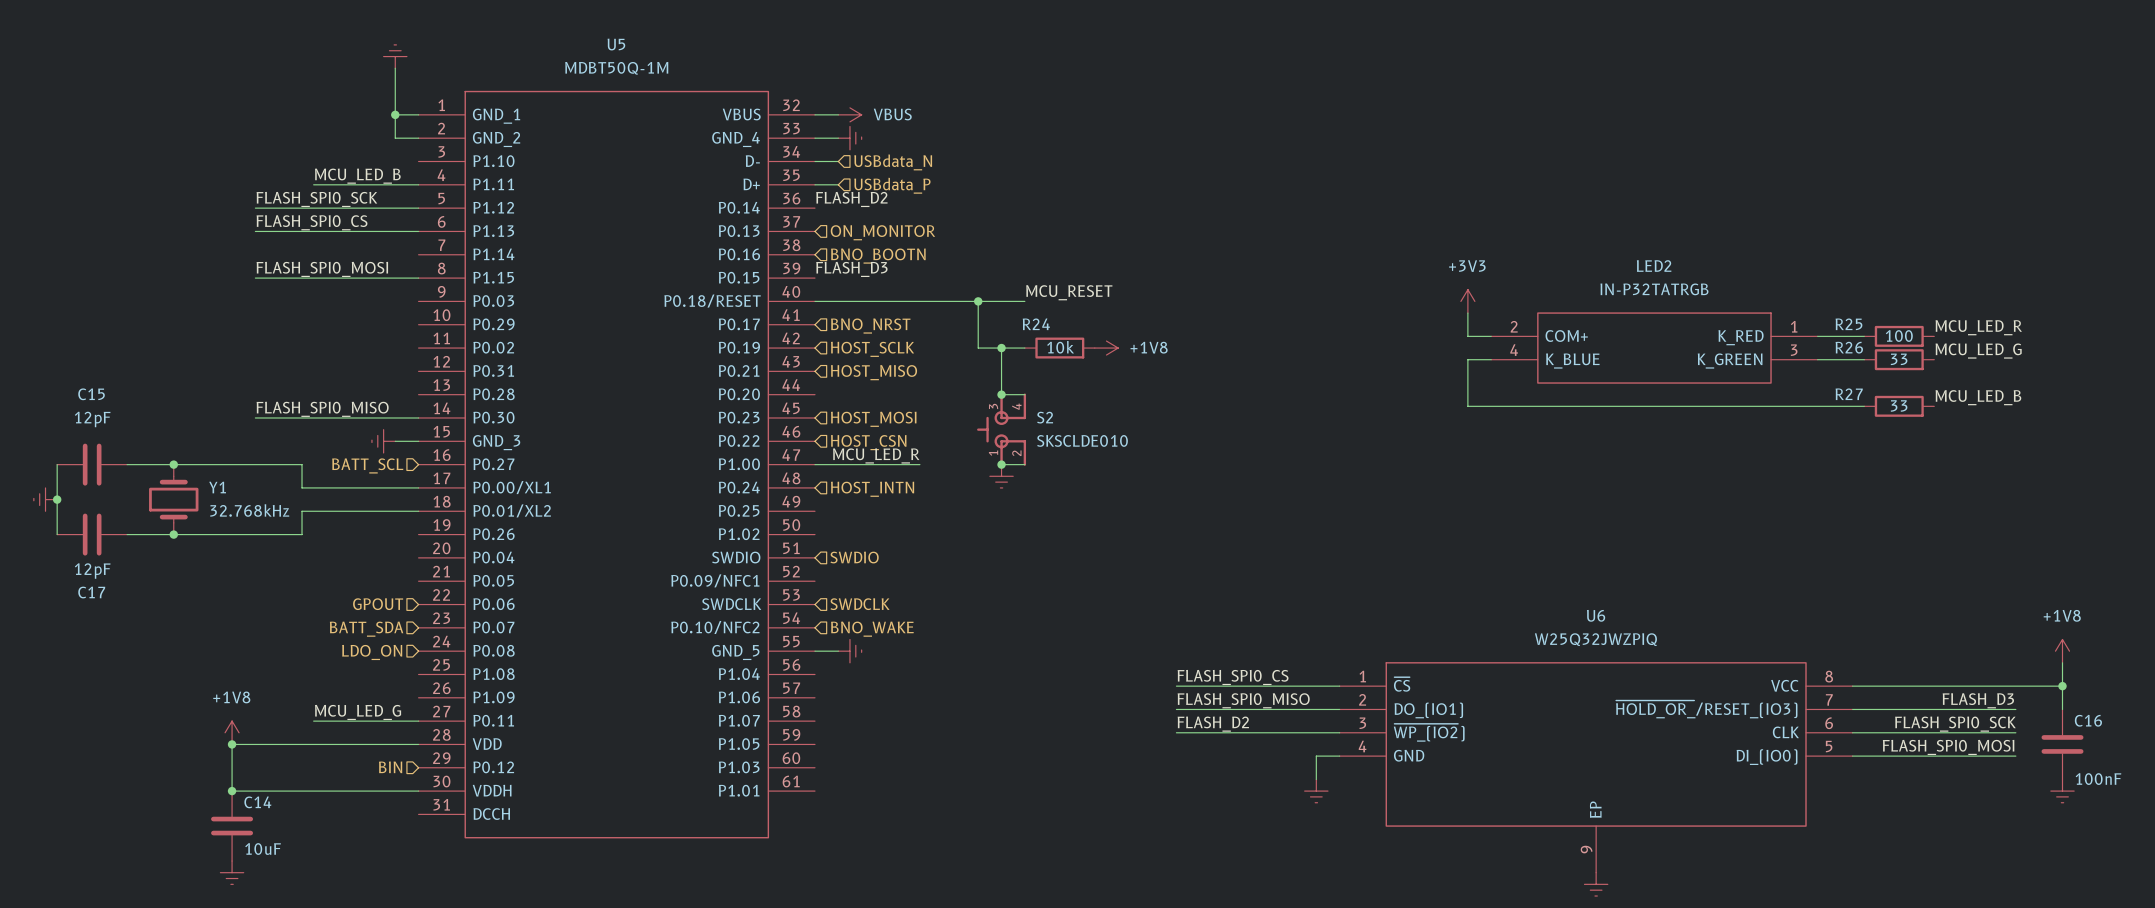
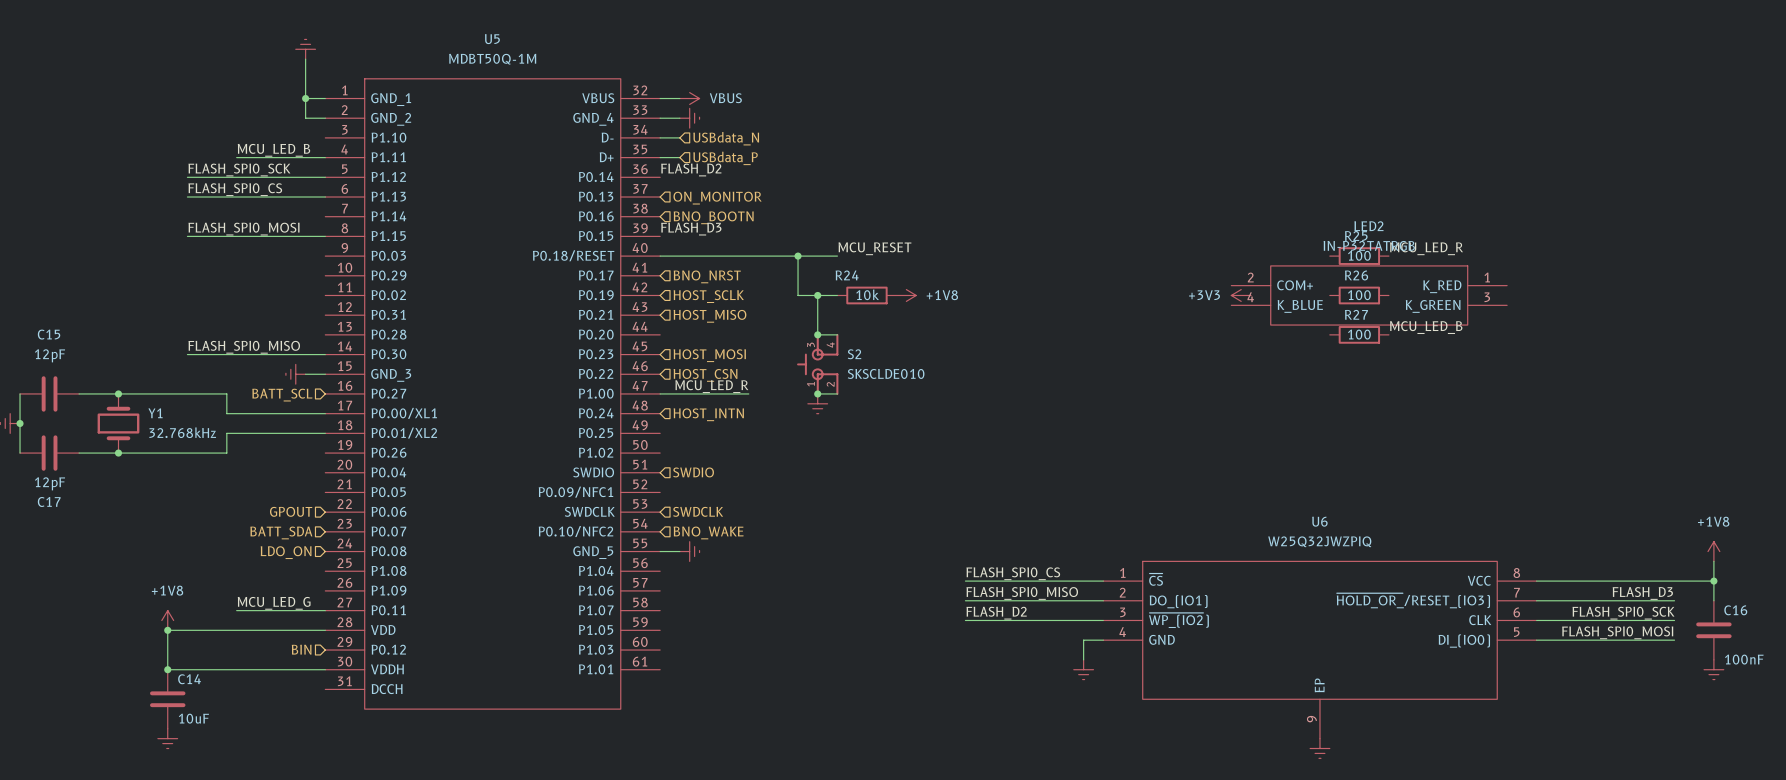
label: none -> MCU_LED_R (1426, 248)
power symbol rotation: 0° (1467, 301) -> 90° counterclockwise (1241, 295)
power symbol position: +3V3 (1467, 301) -> +3V3 (1241, 295)
wire: (1467, 313) (1467, 336) (1491, 336) -> none
R25 name position: R25 (1848, 324) -> R25 (1356, 236)
label: MCU_LED_R (1978, 327) -> none
wire: (1817, 336) (1864, 336) -> none
R25 position: (1899, 336) -> (1359, 256)
R26 name position: R26 (1849, 347) -> R26 (1356, 275)
label: MCU_LED_G (1978, 351) -> none
wire: (1491, 359) (1467, 359) (1467, 406) (1864, 406) -> none
wire: (1817, 359) (1864, 359) -> none
R26 position: (1899, 359) -> (1359, 295)
R26 value: 33 (1899, 359) -> 100 (1359, 295)
label: none -> MCU_LED_B (1426, 327)
R27 name position: R27 (1849, 394) -> R27 (1356, 314)
label: MCU_LED_B (1978, 397) -> none
R27 value: 33 (1899, 405) -> 100 (1359, 334)
R27 position: (1899, 406) -> (1359, 334)

